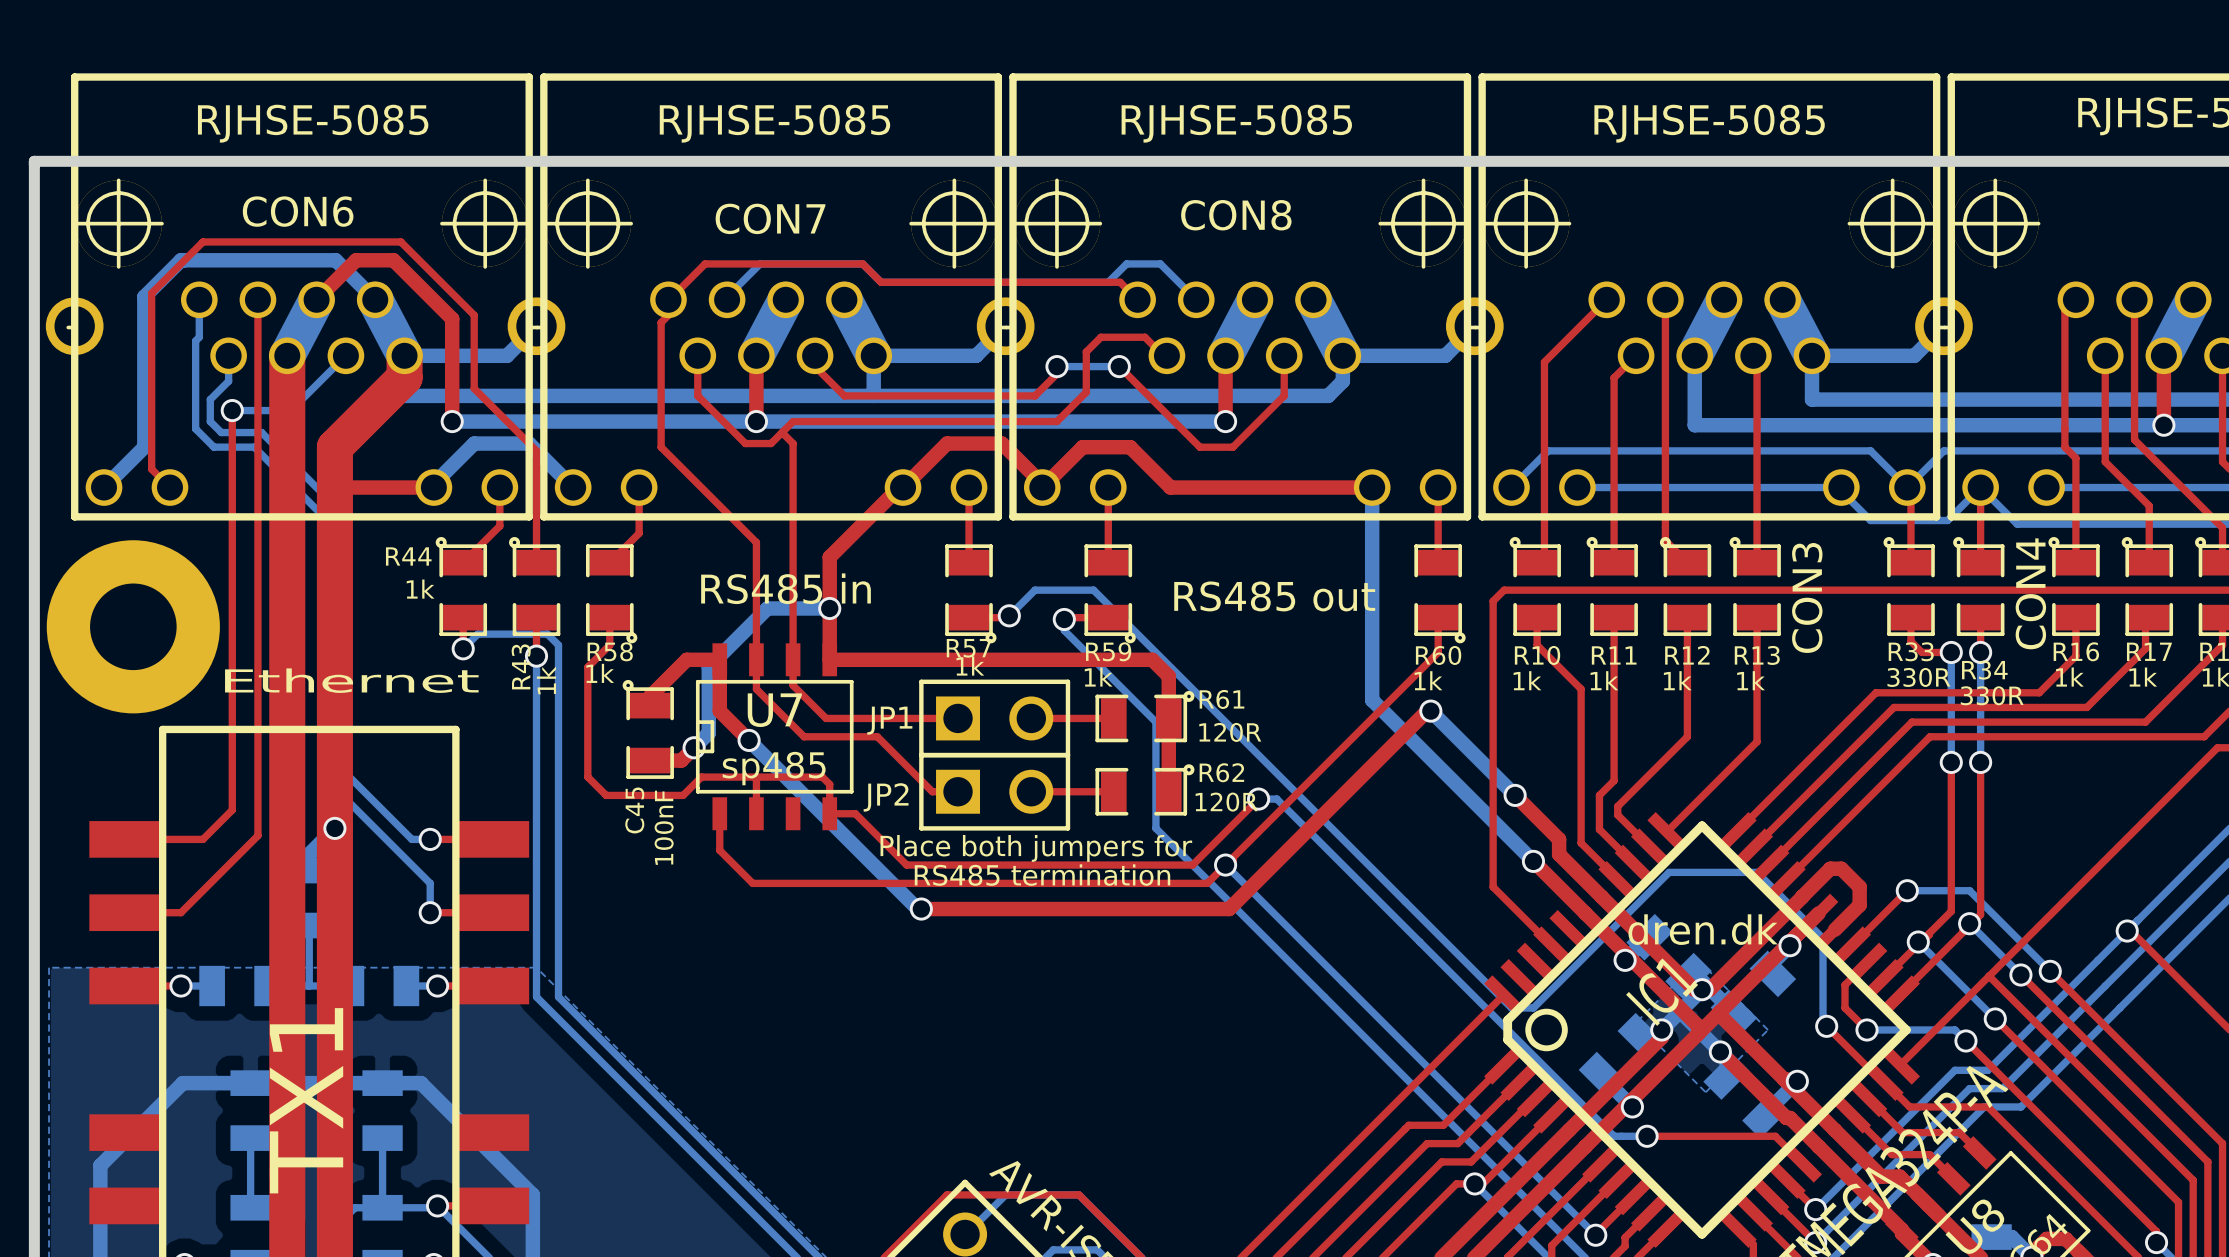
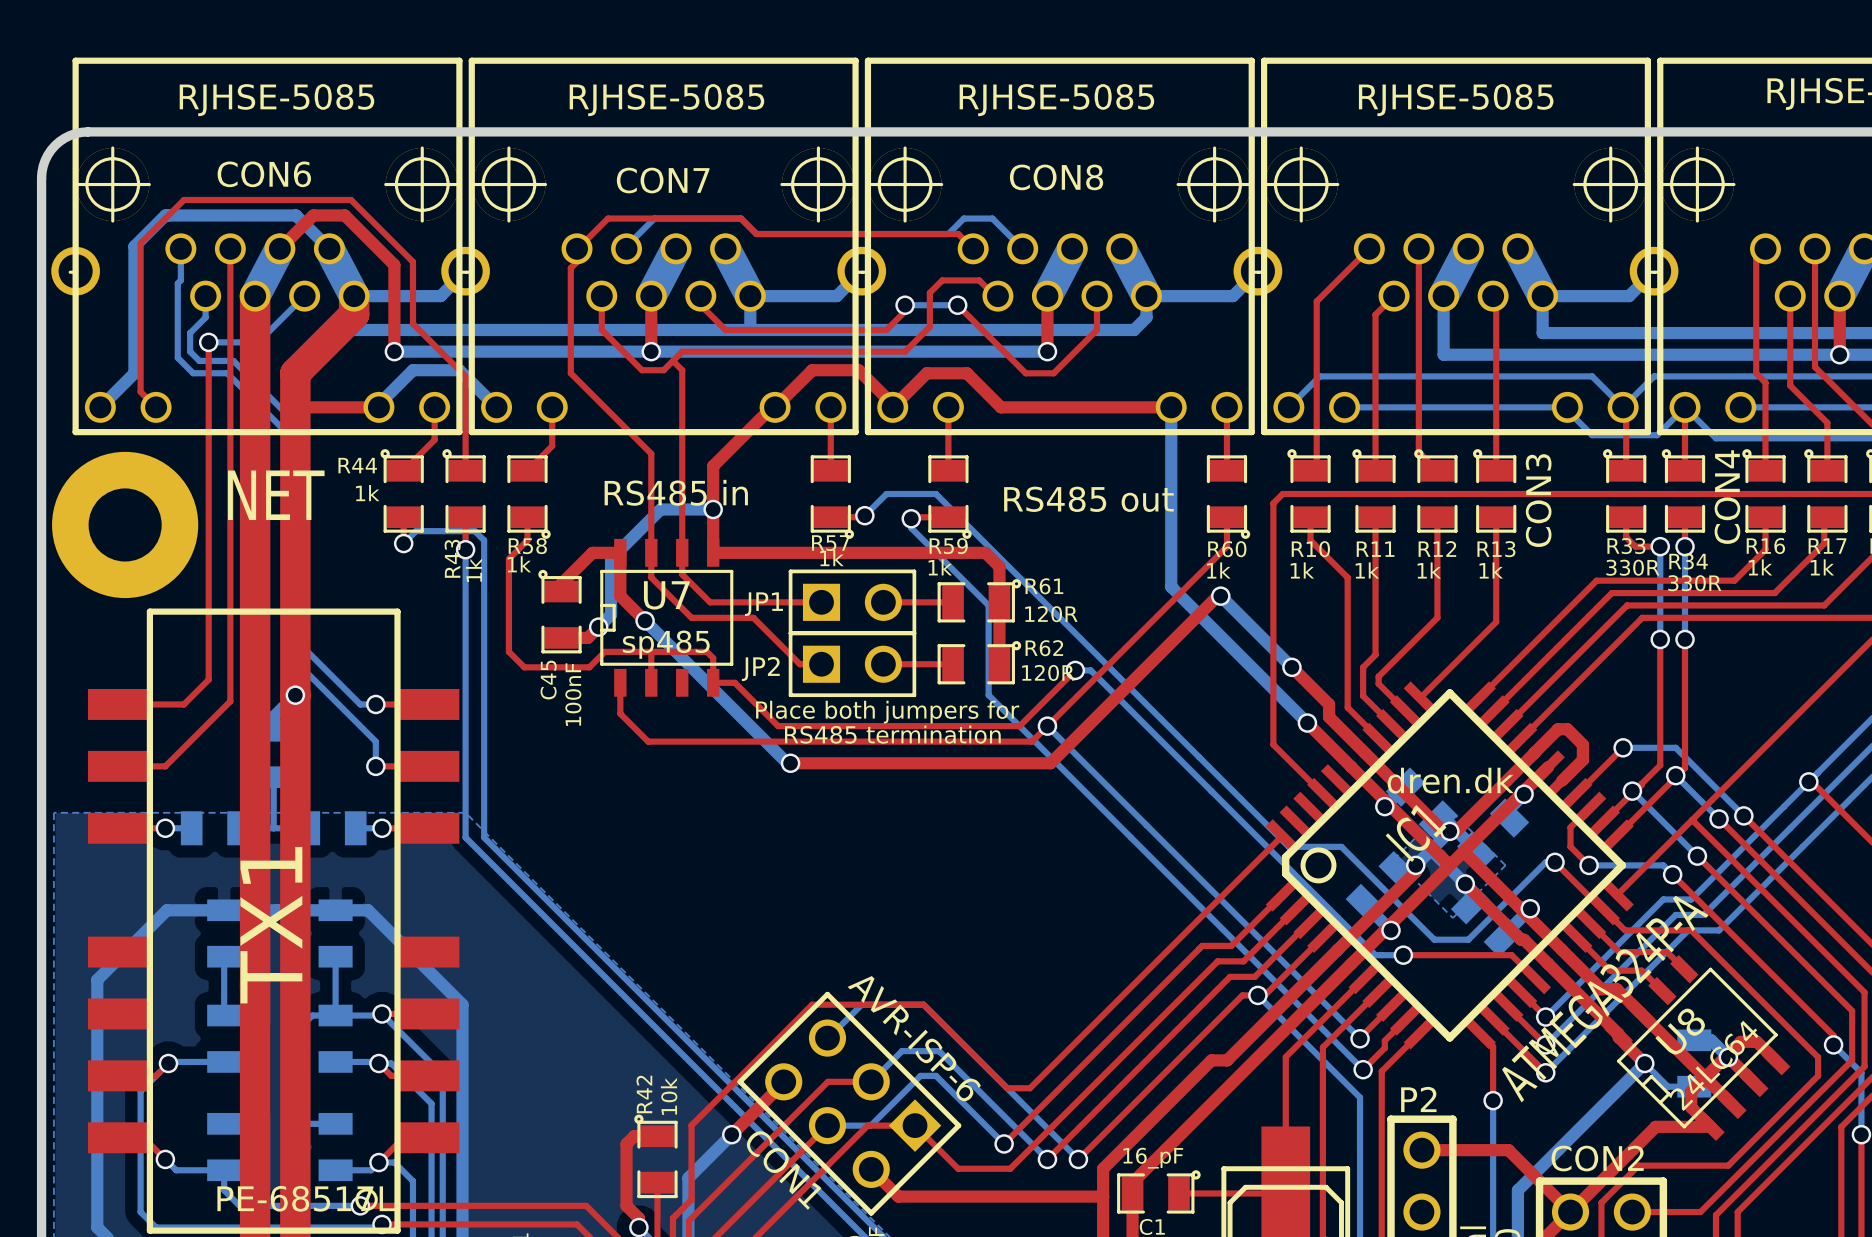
board edge: (89, 161) (34, 161) (34, 216) -> (88, 131) (70, 135) (55, 145) (45, 160) (41, 178)
text: none -> NET (276, 495)
text: Ethernet (351, 680) -> none
bottom track: (1533, 1008) (1669, 872) (1757, 872) (1823, 938) (1823, 1022) -> (1307, 846) (1341, 846) (1434, 939) (1468, 939) (1545, 862) (1555, 862)

